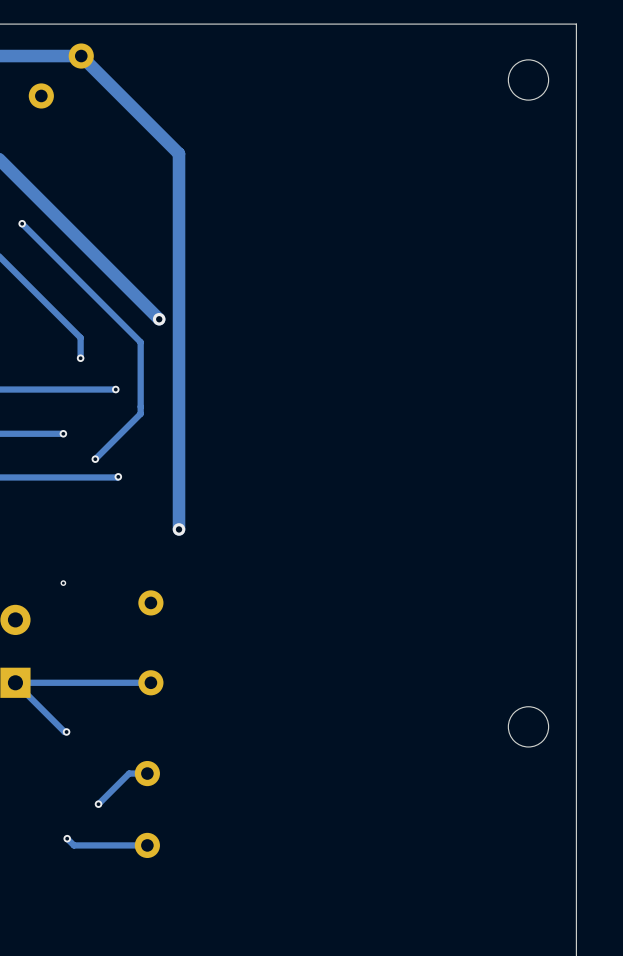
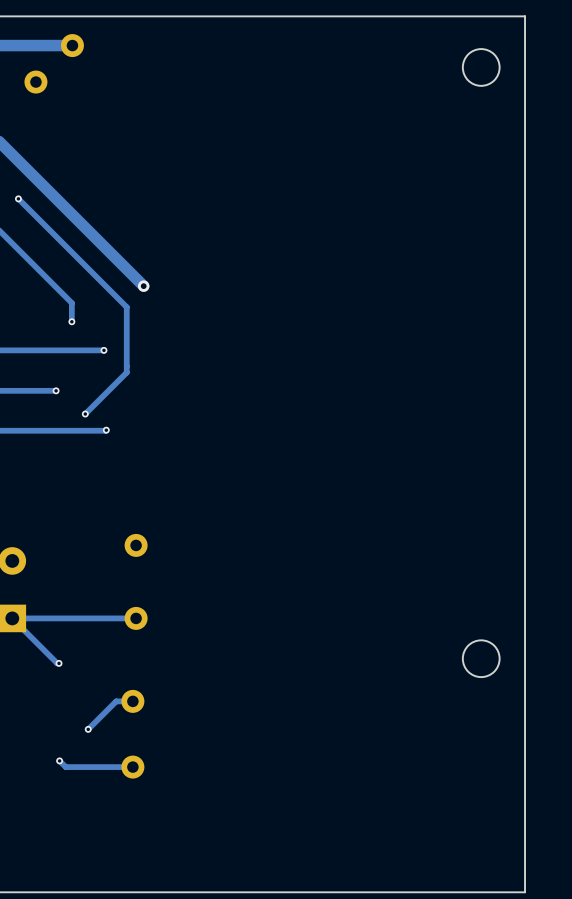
track: (81, 56) (179, 153) (179, 529) -> none
via: (179, 529) -> none
via: (63, 583) -> none

